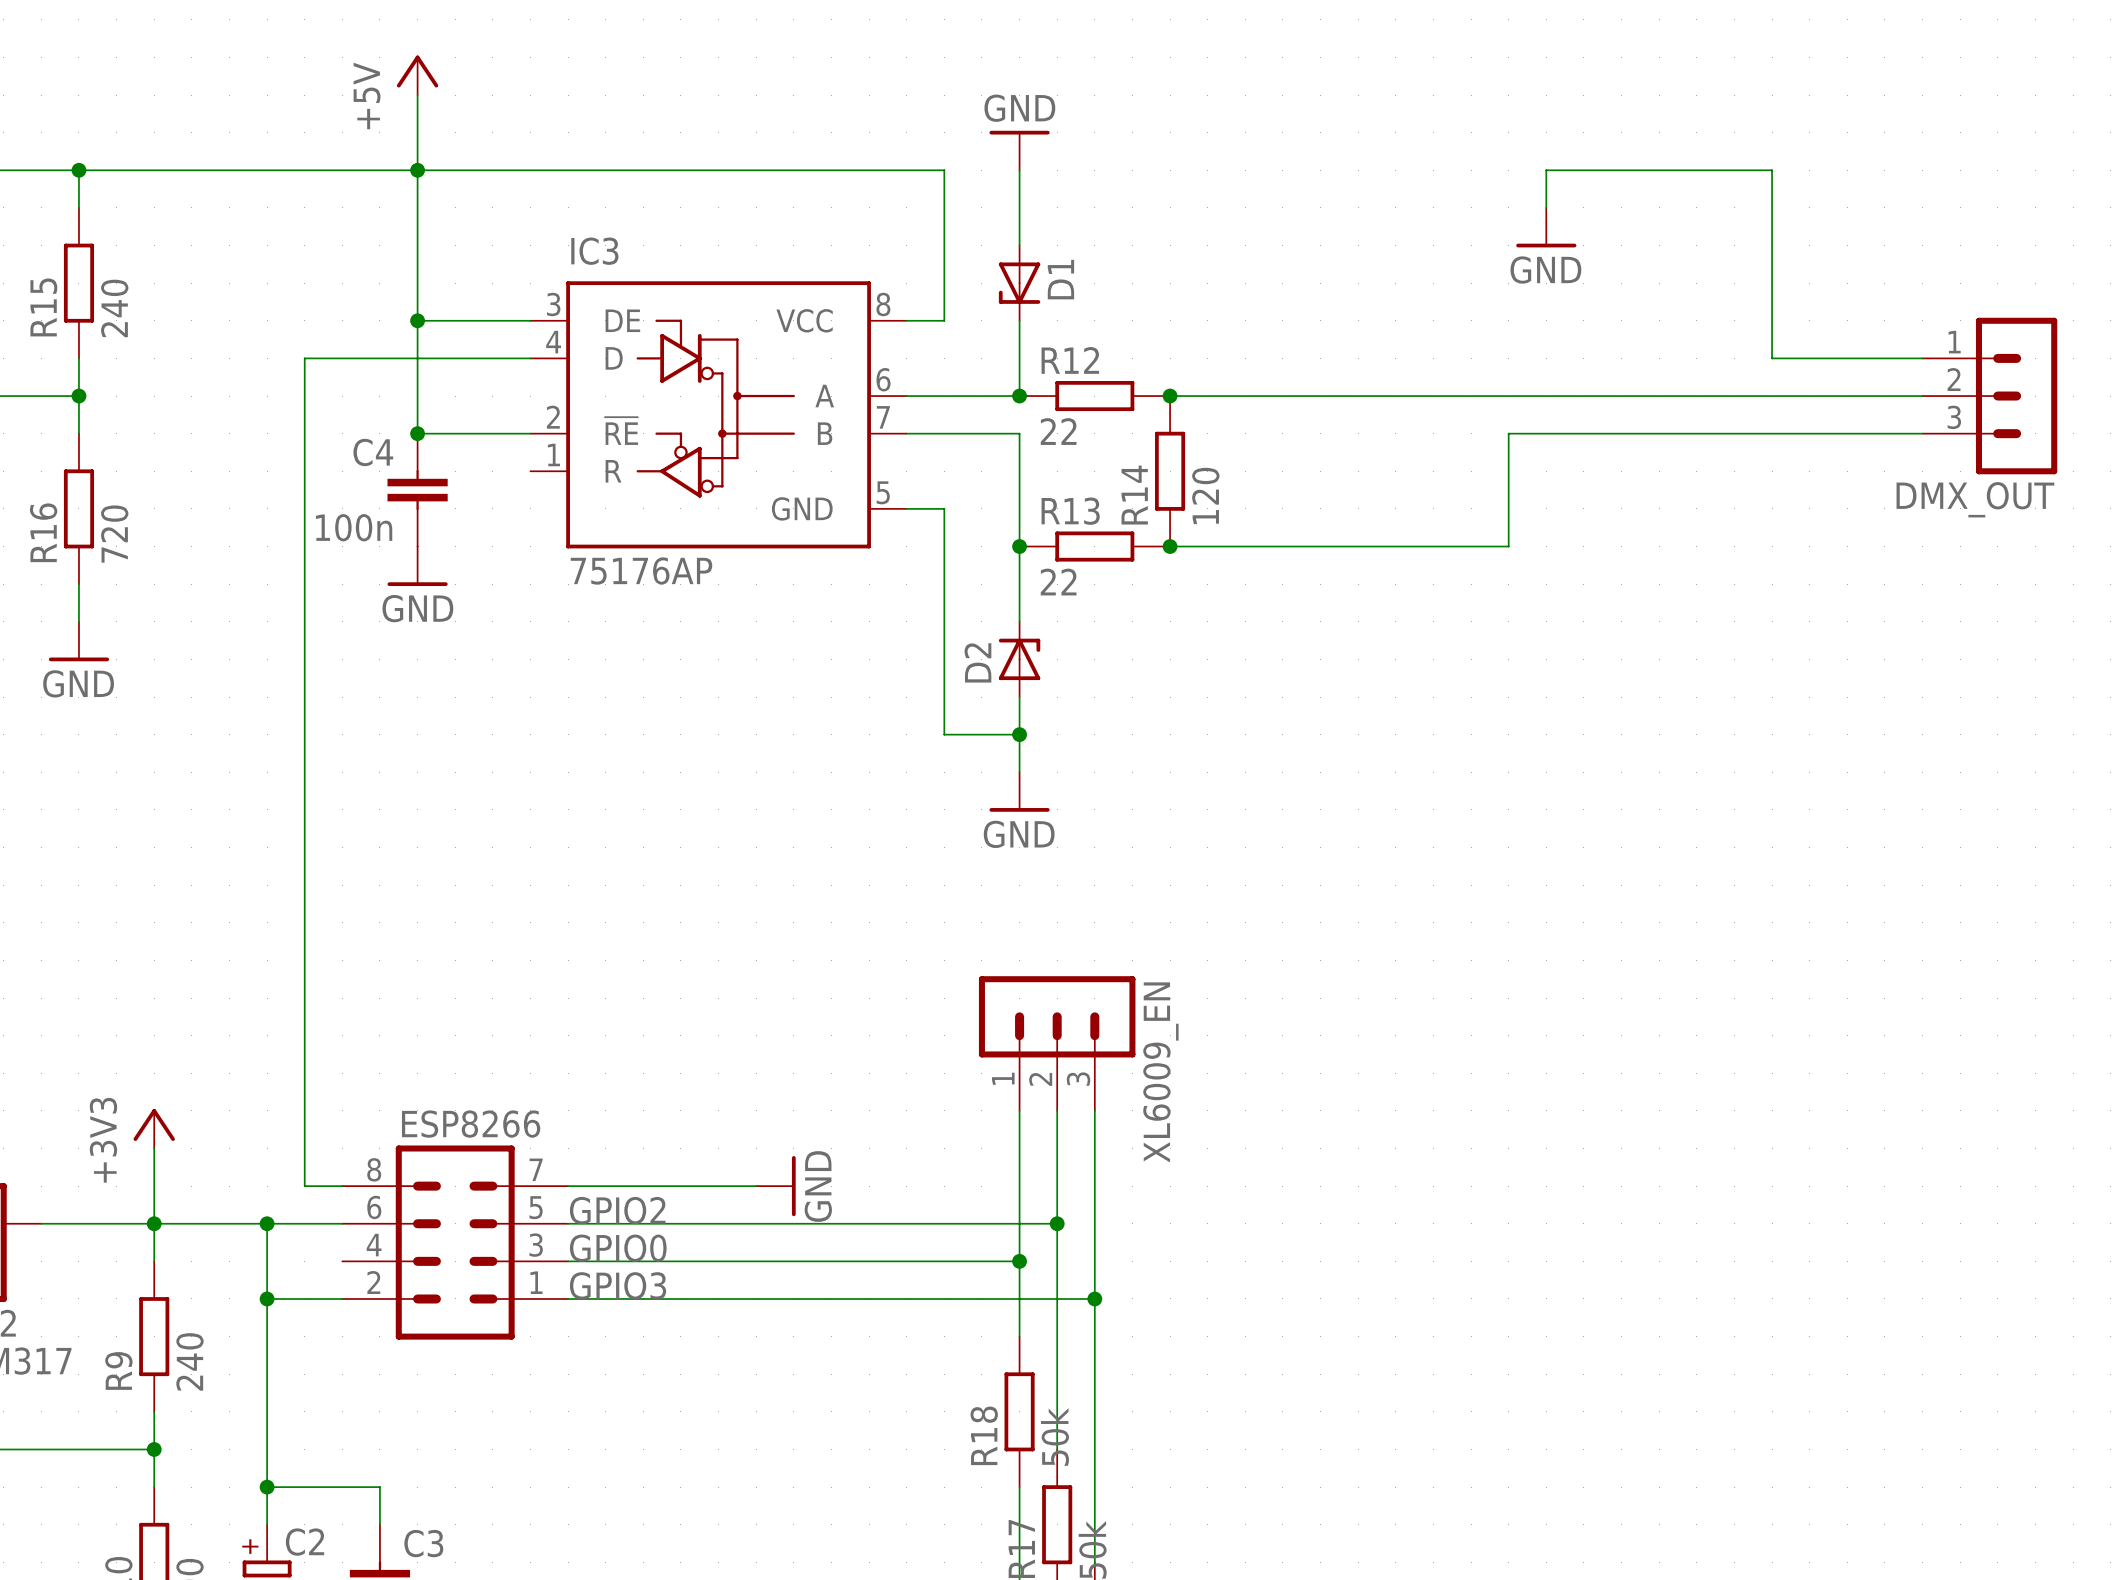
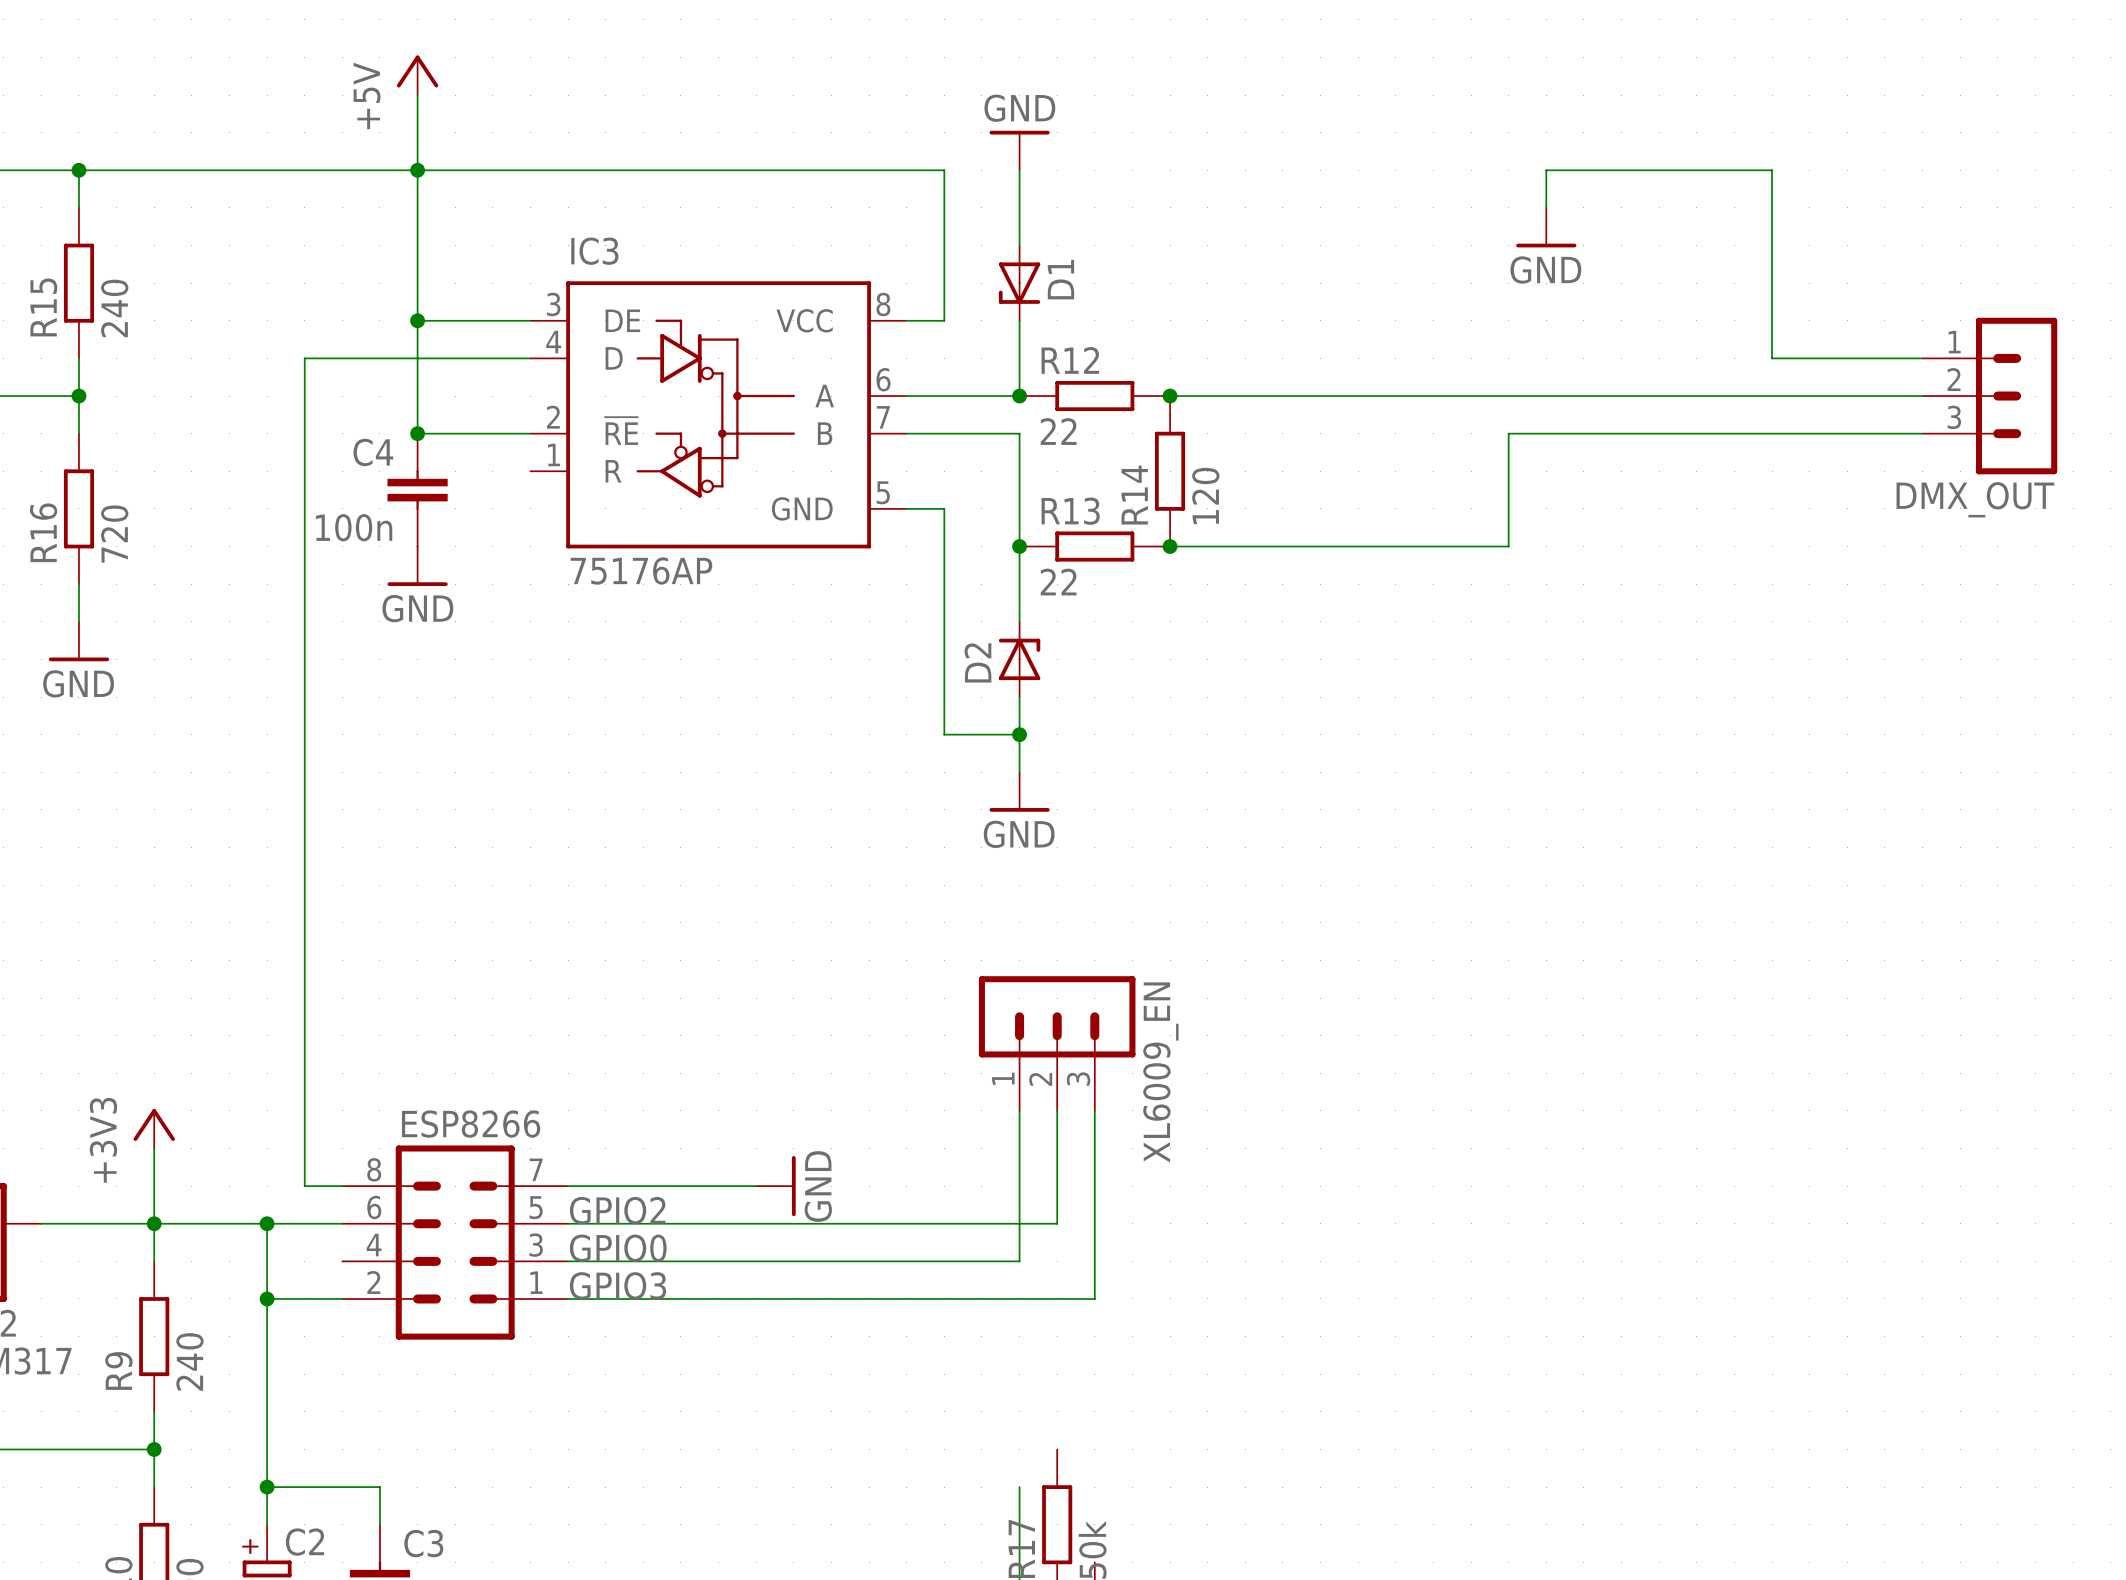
wire: (1057, 1223) (1057, 1449) -> none
junction: (1057, 1223) -> none
wire: (1019, 1261) (1019, 1336) -> none
junction: (1019, 1261) -> none
wire: (1094, 1298) (1094, 1562) -> none
junction: (1094, 1298) -> none
R18: 50k (1019, 1411) -> none

